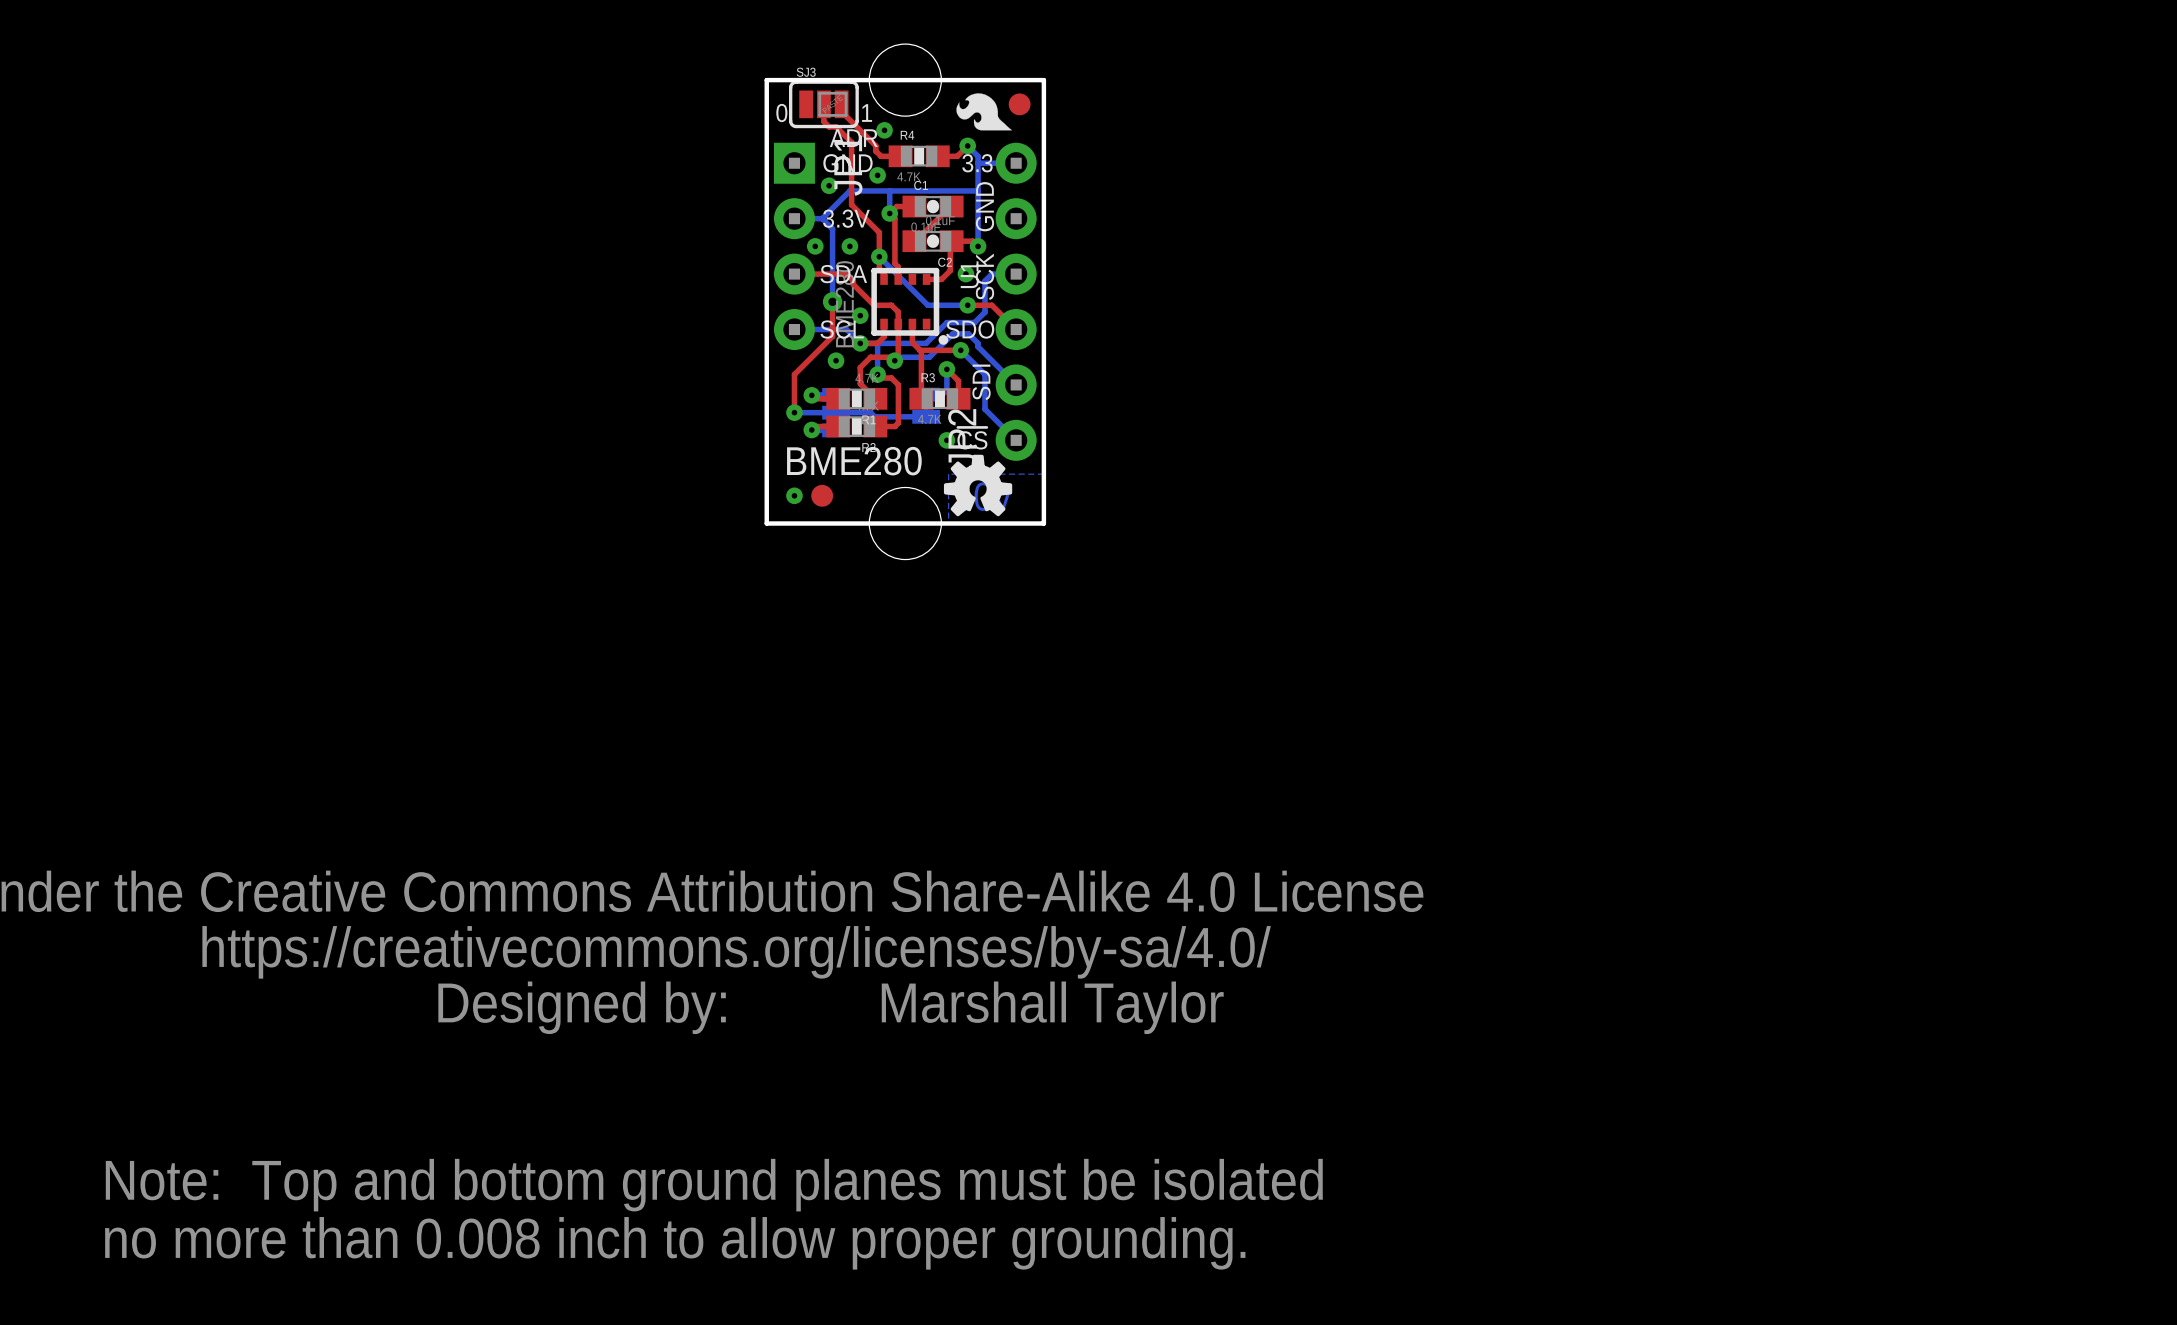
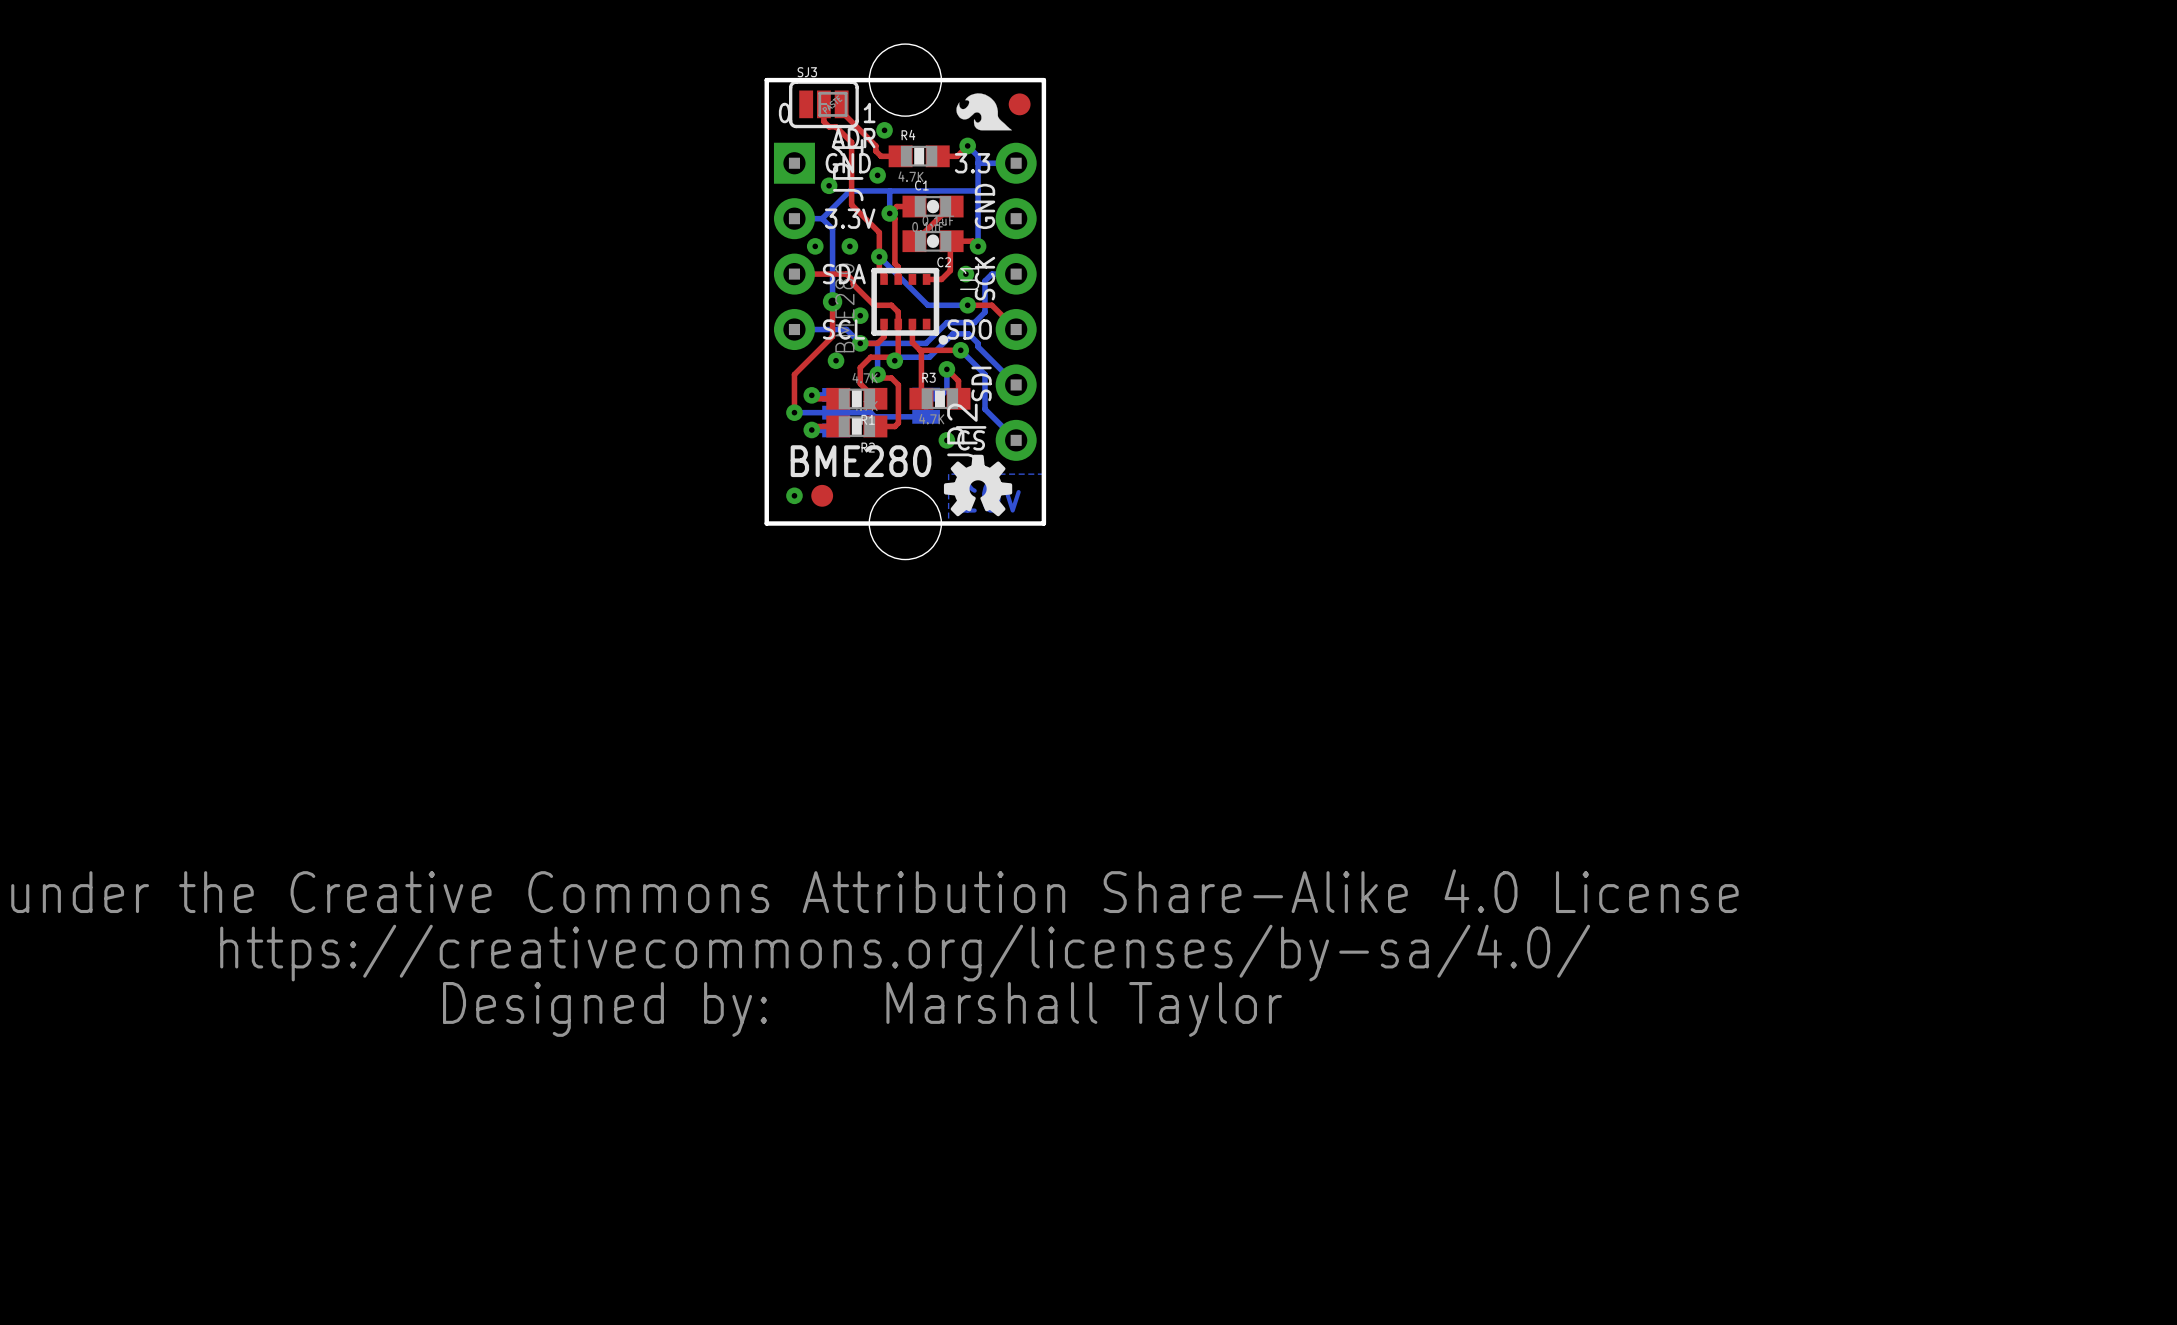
text: Note: Top and bottom ground planes must be isolated (714, 1185) -> none
text: no more than 0.008 inch to allow proper grounding. (675, 1243) -> none

